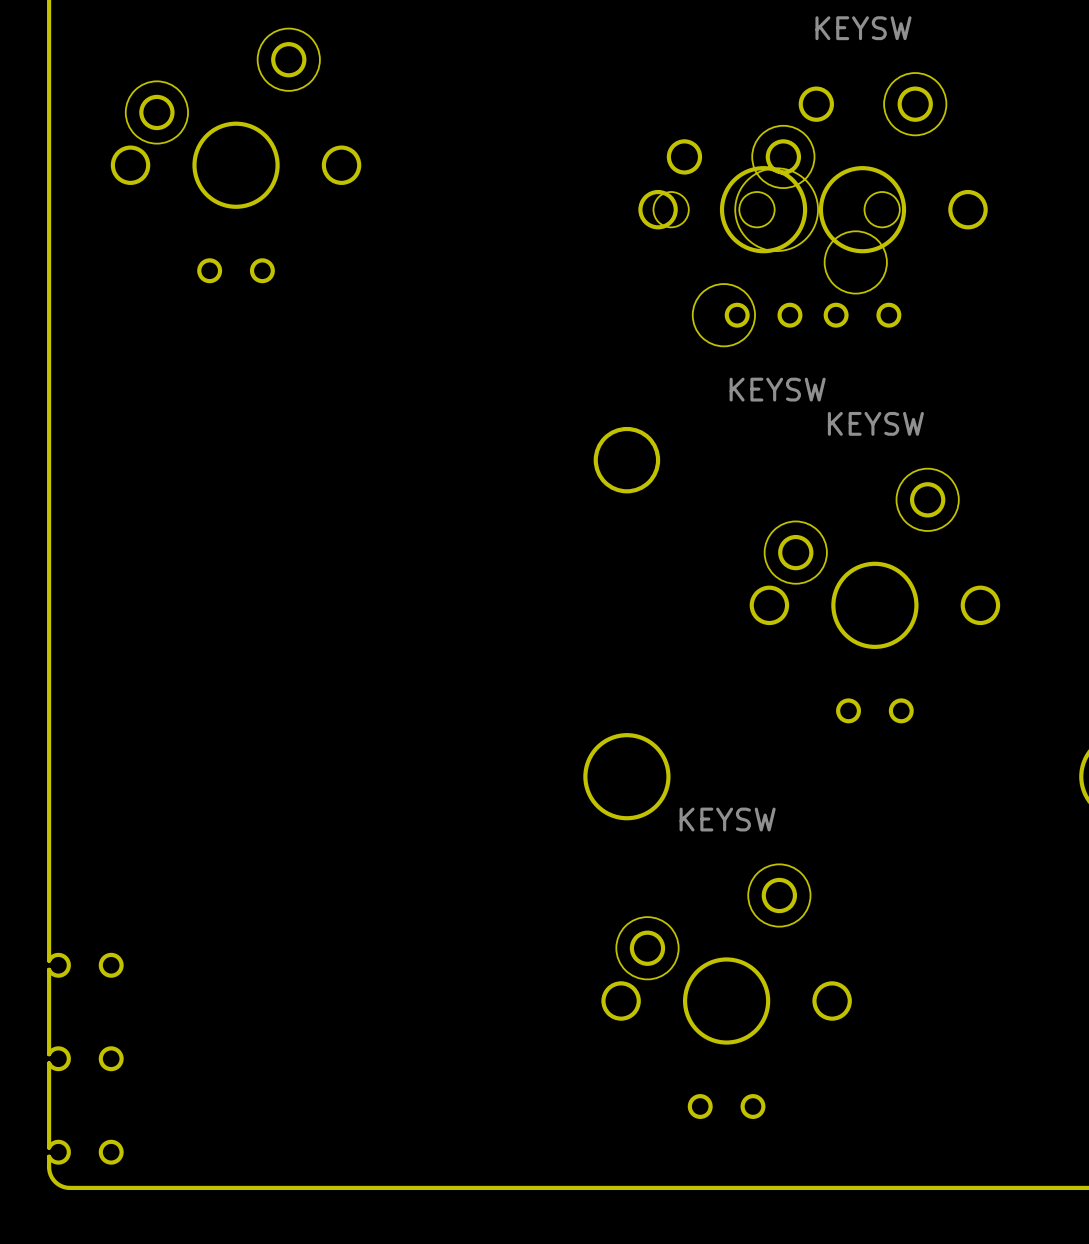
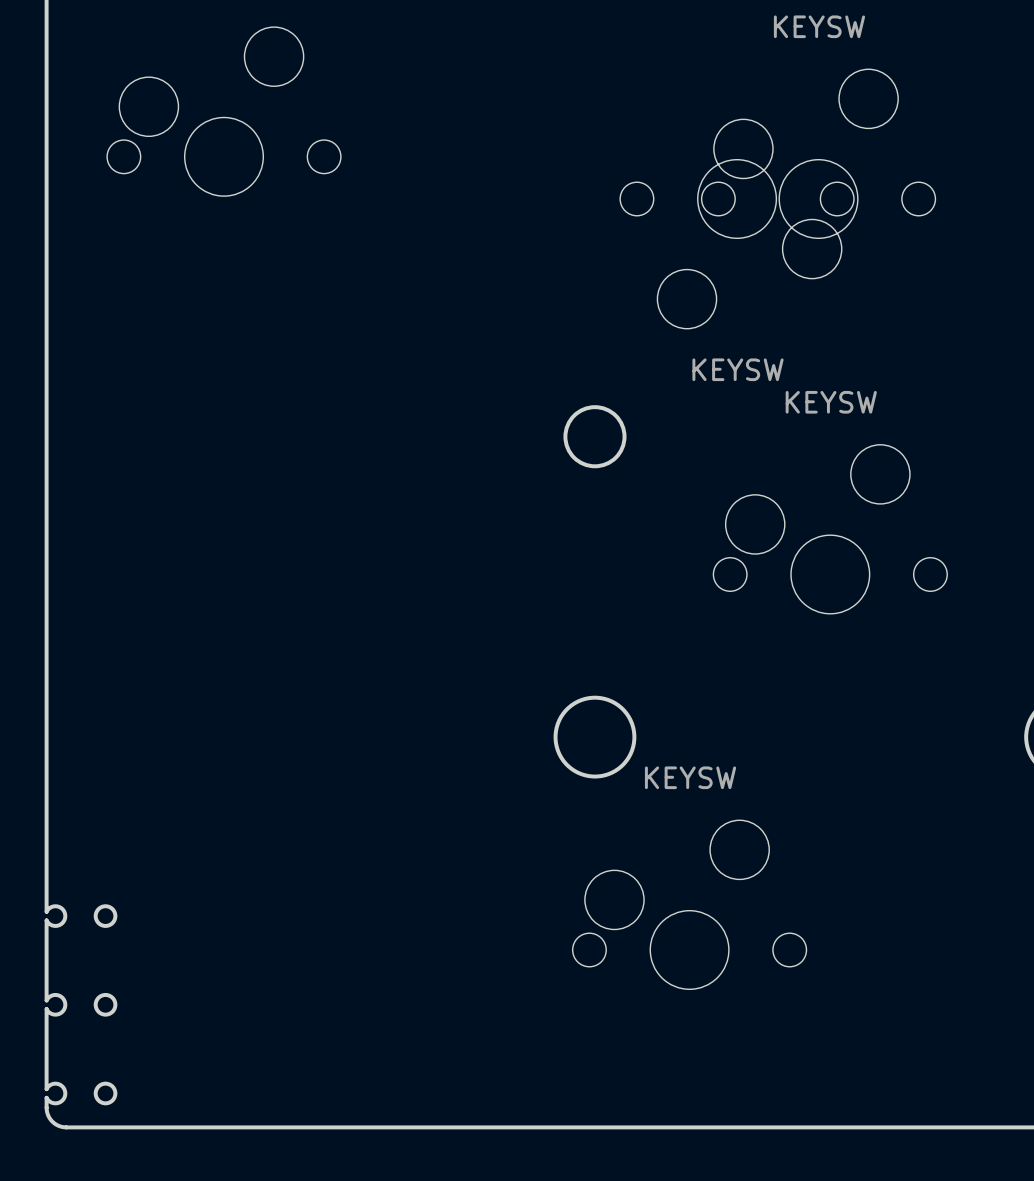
round board edge: [271, 42, 307, 78] -> none
round board edge: [798, 86, 834, 122] -> none
round board edge: [897, 86, 933, 122] -> none
round board edge: [139, 94, 175, 131] -> none
round board edge: [192, 121, 280, 209] -> none
round board edge: [666, 139, 703, 175] -> none
round board edge: [765, 139, 802, 175] -> none
round board edge: [110, 145, 151, 185] -> none
round board edge: [321, 145, 362, 185] -> none
round board edge: [719, 166, 808, 254] -> none
round board edge: [818, 166, 907, 254] -> none
round board edge: [638, 189, 678, 230] -> none
round board edge: [948, 189, 988, 230] -> none
round board edge: [197, 258, 223, 284] -> none
round board edge: [249, 258, 275, 284] -> none
round board edge: [724, 302, 750, 328] -> none
round board edge: [777, 302, 803, 328] -> none
round board edge: [823, 302, 849, 328] -> none
round board edge: [876, 302, 902, 328] -> none
round board edge: [910, 482, 946, 518] -> none
round board edge: [778, 534, 814, 571] -> none
round board edge: [831, 561, 919, 649] -> none
round board edge: [749, 585, 790, 626] -> none
round board edge: [960, 585, 1001, 626] -> none
round board edge: [836, 698, 861, 724] -> none
round board edge: [888, 698, 914, 724] -> none
round board edge: [761, 877, 798, 914] -> none
round board edge: [629, 930, 666, 966] -> none
round board edge: [682, 957, 771, 1045] -> none
round board edge: [601, 981, 641, 1021] -> none
round board edge: [812, 981, 852, 1021] -> none
round board edge: [687, 1094, 713, 1119] -> none
round board edge: [740, 1094, 766, 1119] -> none

